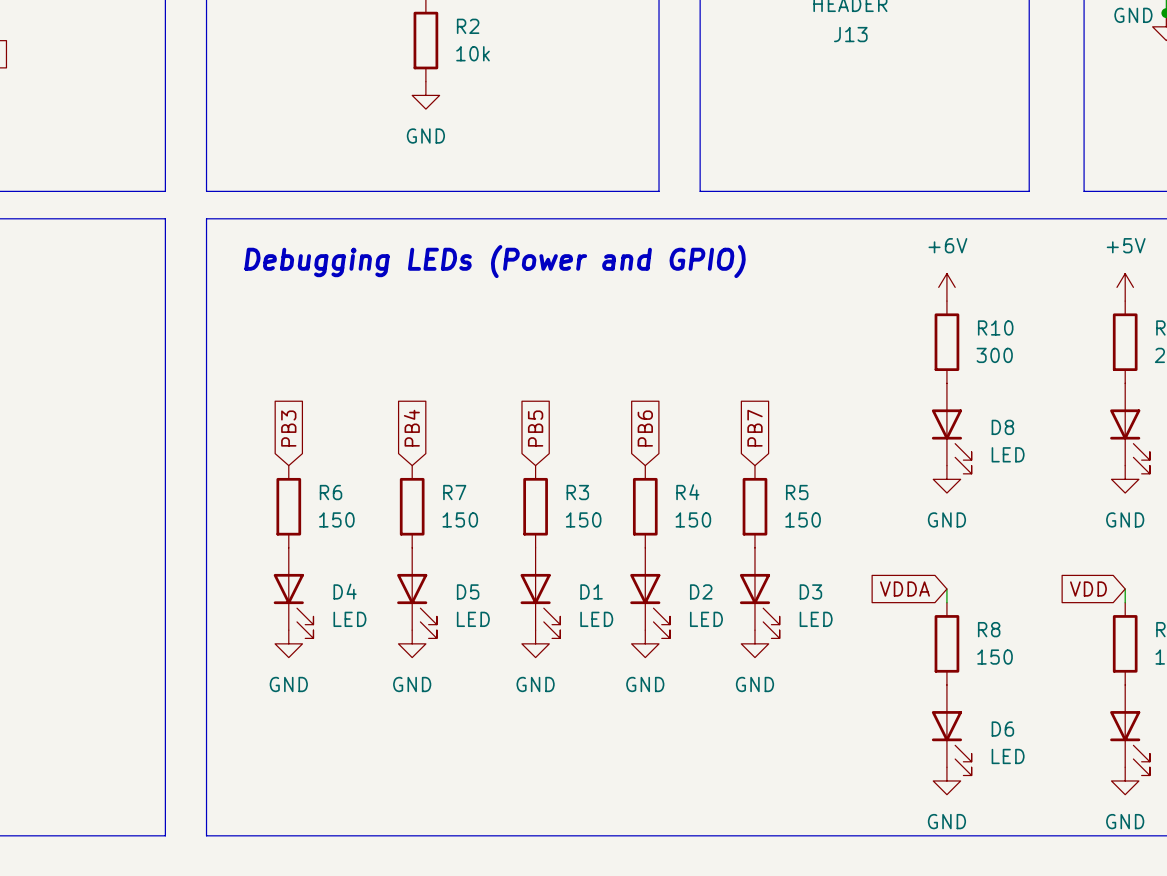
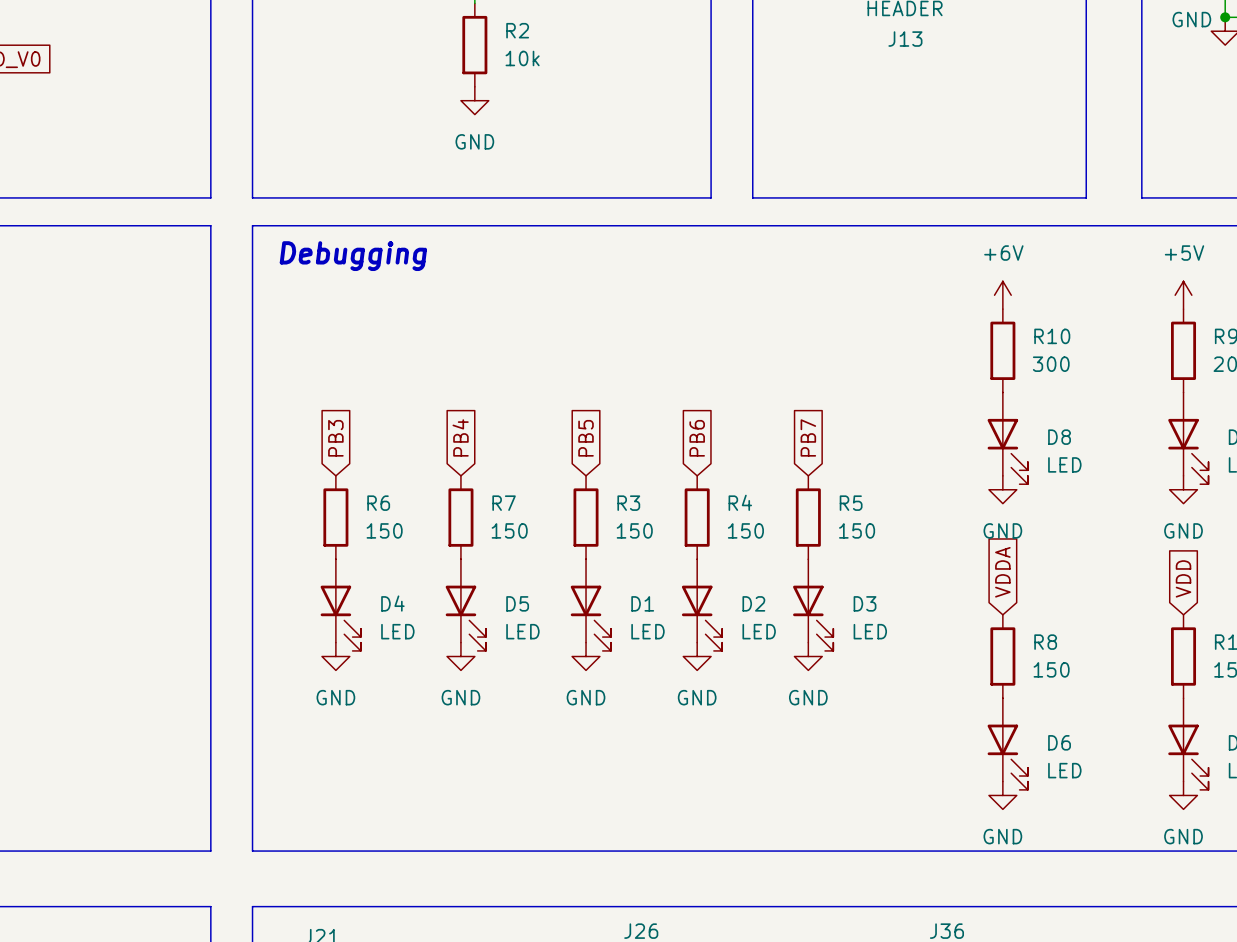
text: none -> Debugging (353, 256)
text: Debugging LEDs (Power and GPIO) (495, 261) -> none
global label rotation: 0° (904, 589) -> 90° clockwise (1002, 572)
wire: (946, 589) (946, 602) -> none
global label rotation: 0° (1088, 589) -> 90° clockwise (1183, 578)
wire: (1125, 589) (1125, 602) -> none

